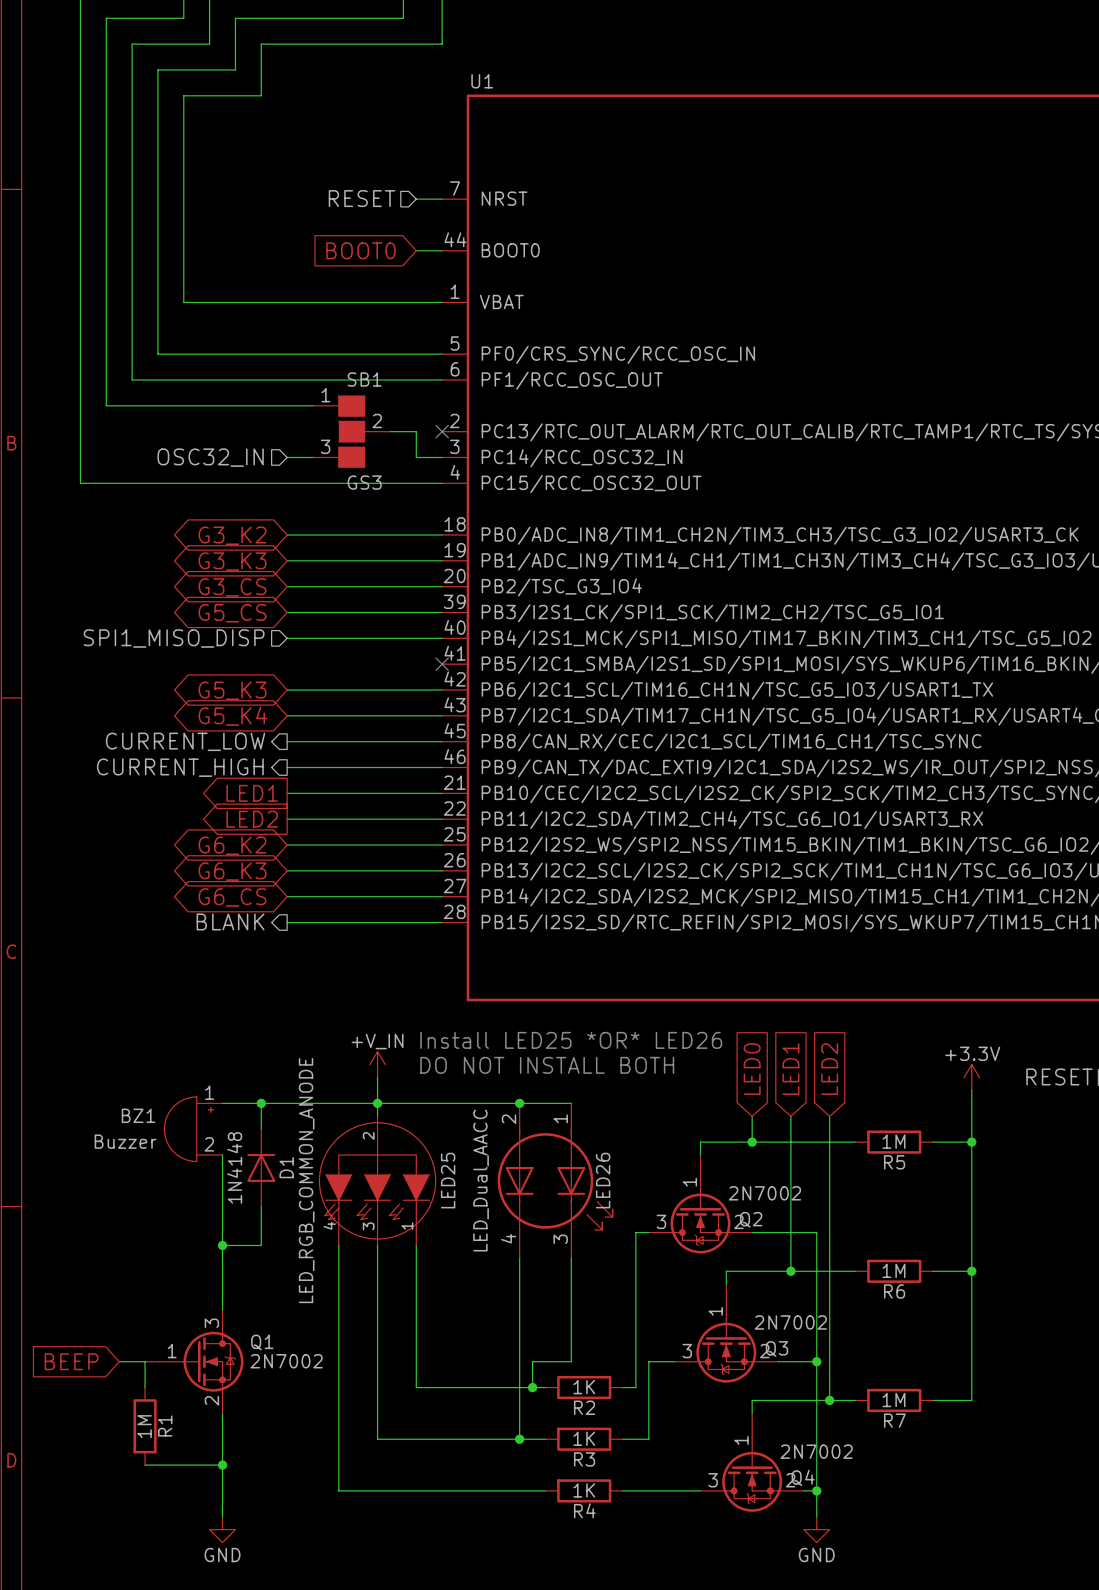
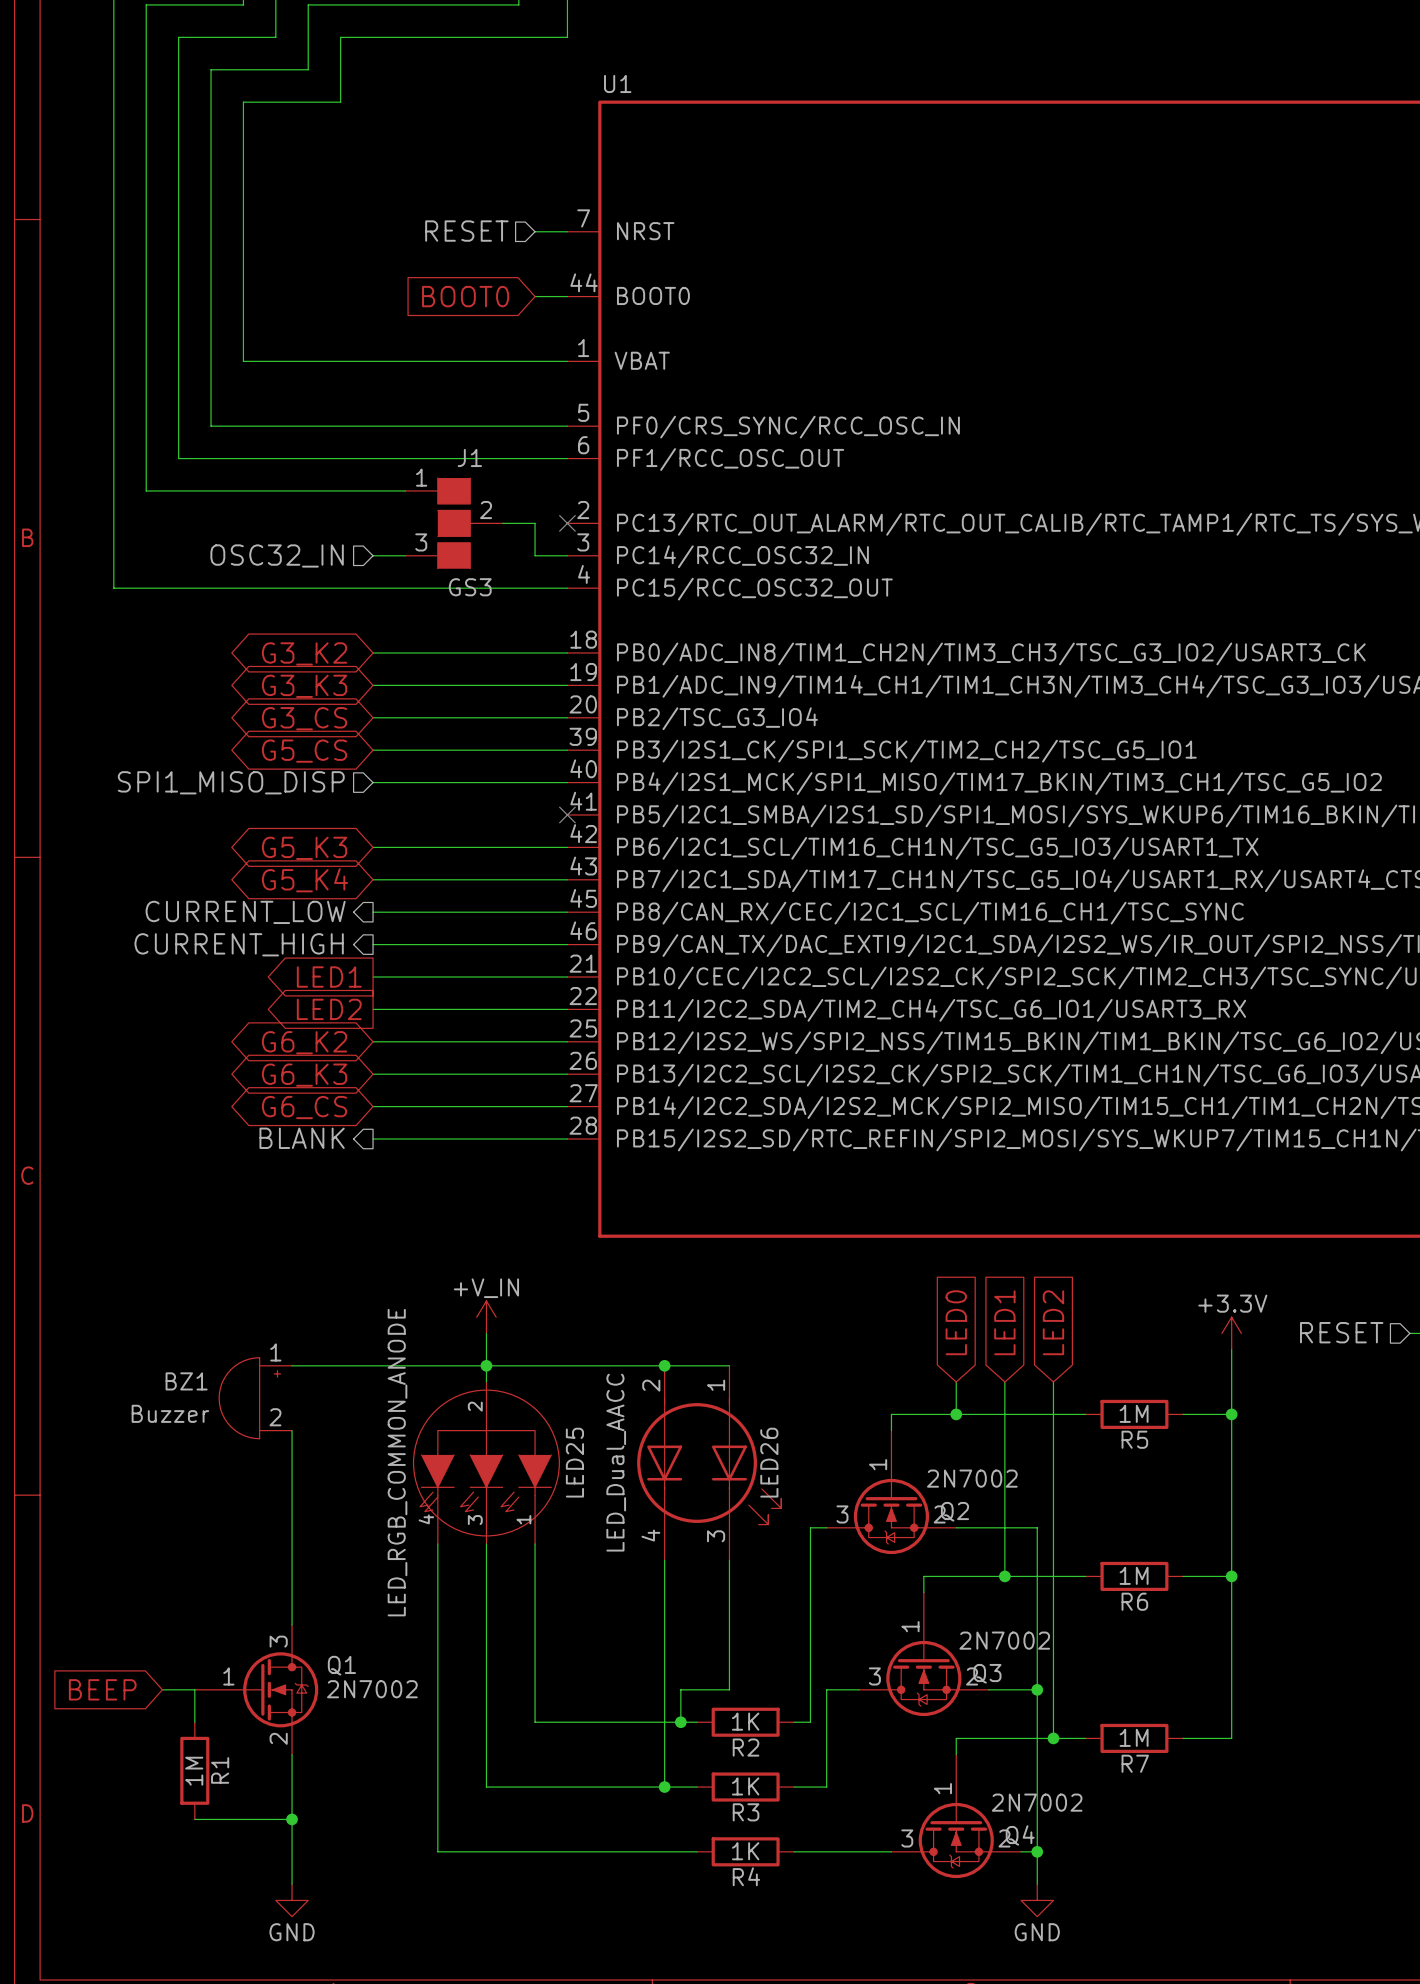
SB1 name: SB1 (364, 379) -> J1 (469, 457)
text: Install LED25 *OR* LED26 (571, 1040) -> none
text: DO NOT INSTALL BOTH (547, 1065) -> none
wire: (261, 1103) (261, 1129) -> none
junction: (261, 1103) -> none
D1: 1N4148 (261, 1167) -> none
wire: (261, 1206) (261, 1245) (222, 1245) -> none
junction: (222, 1245) -> none

